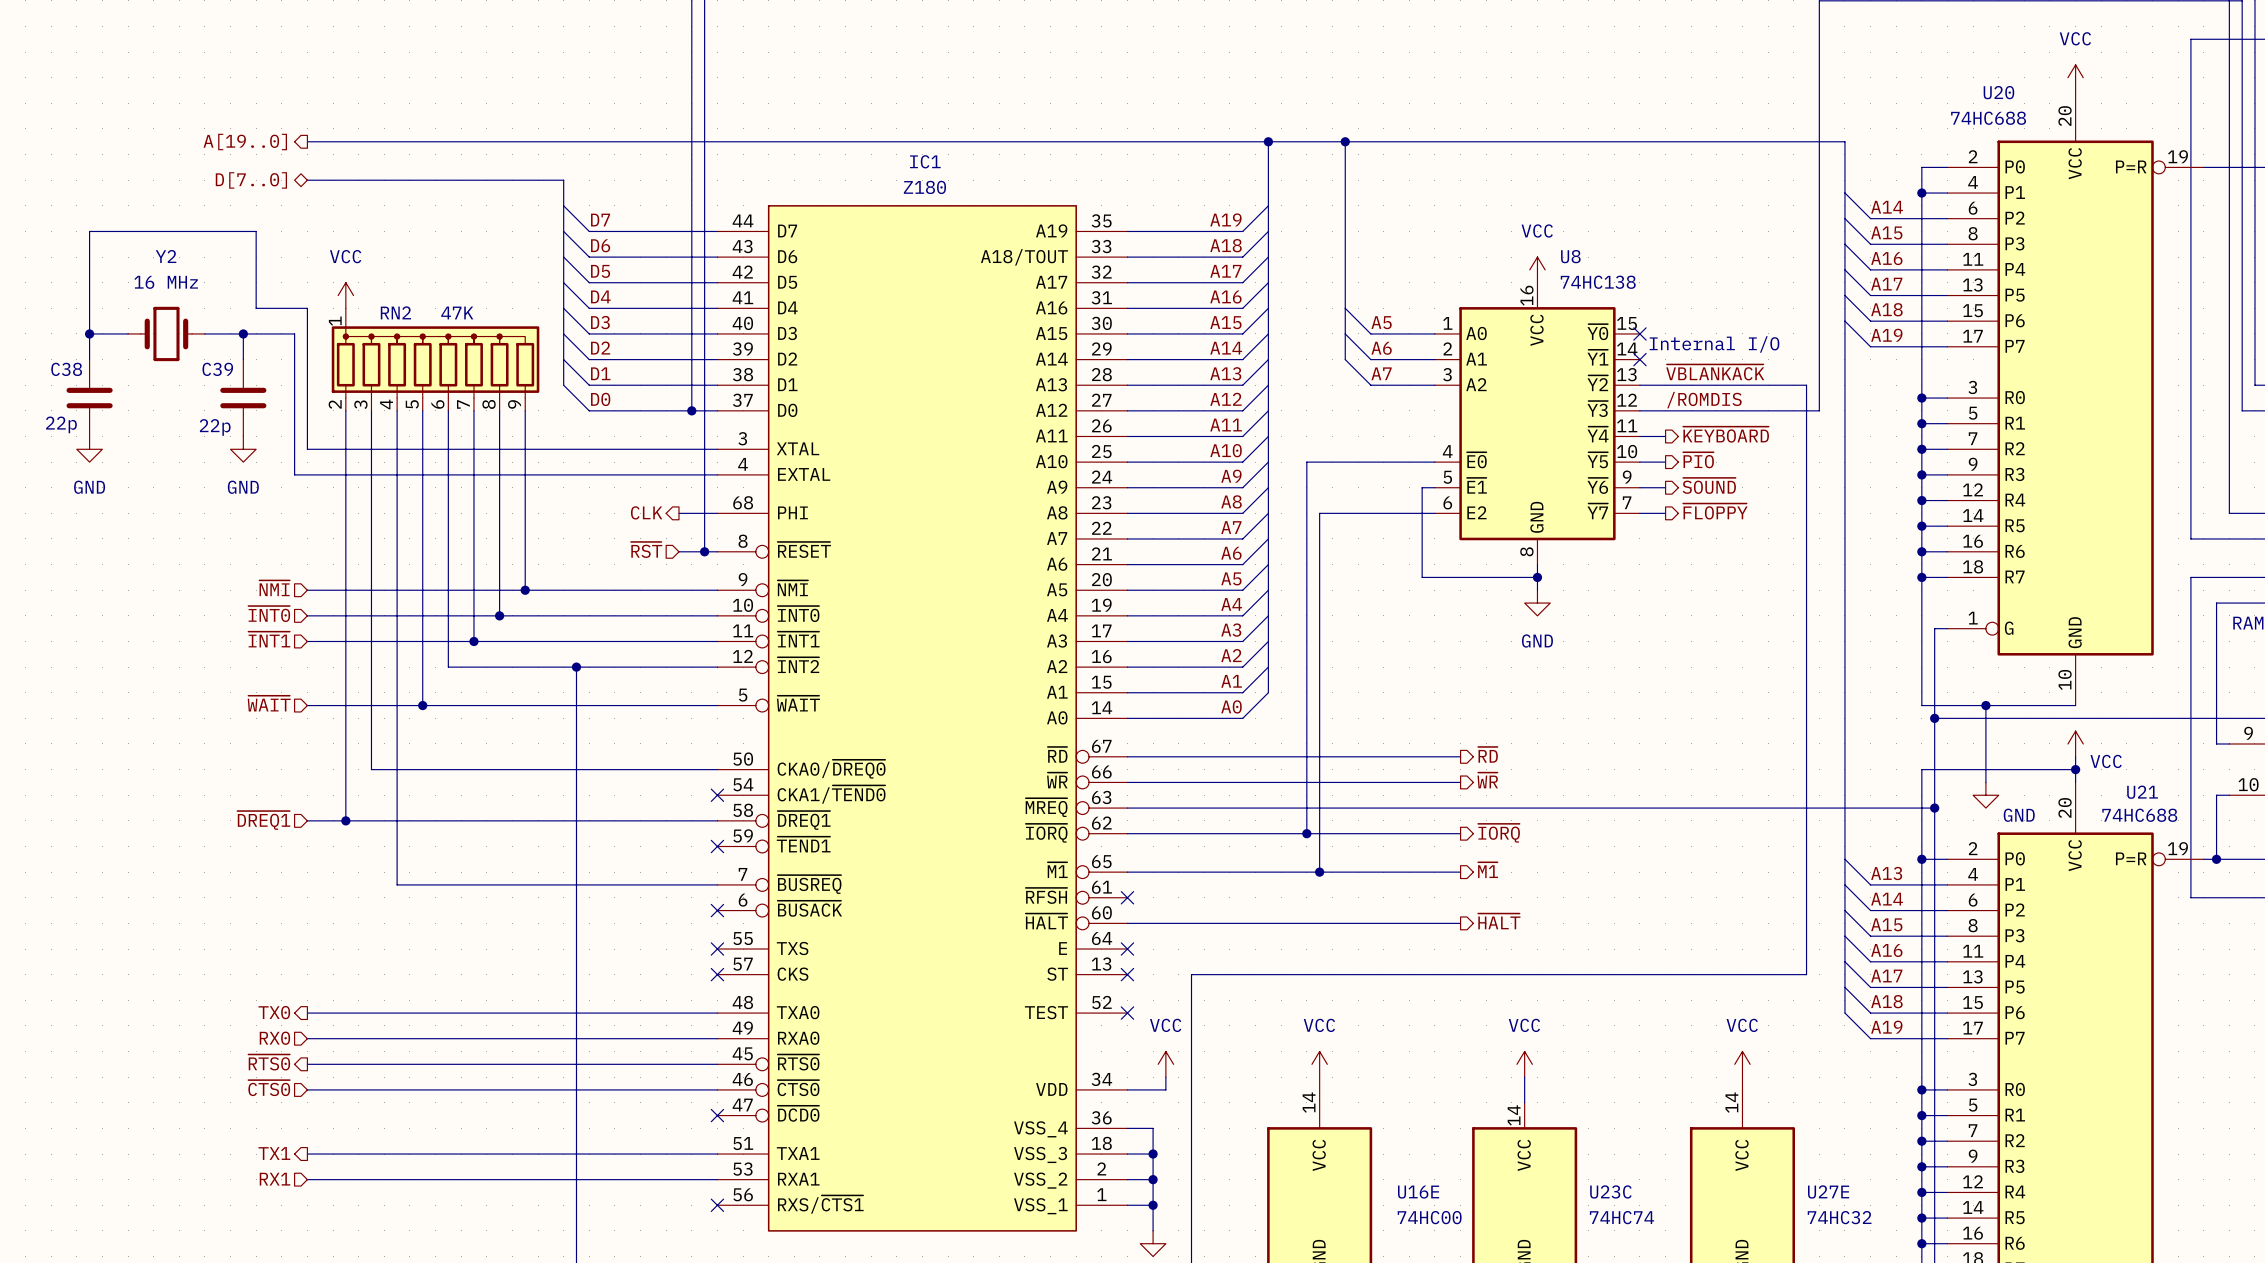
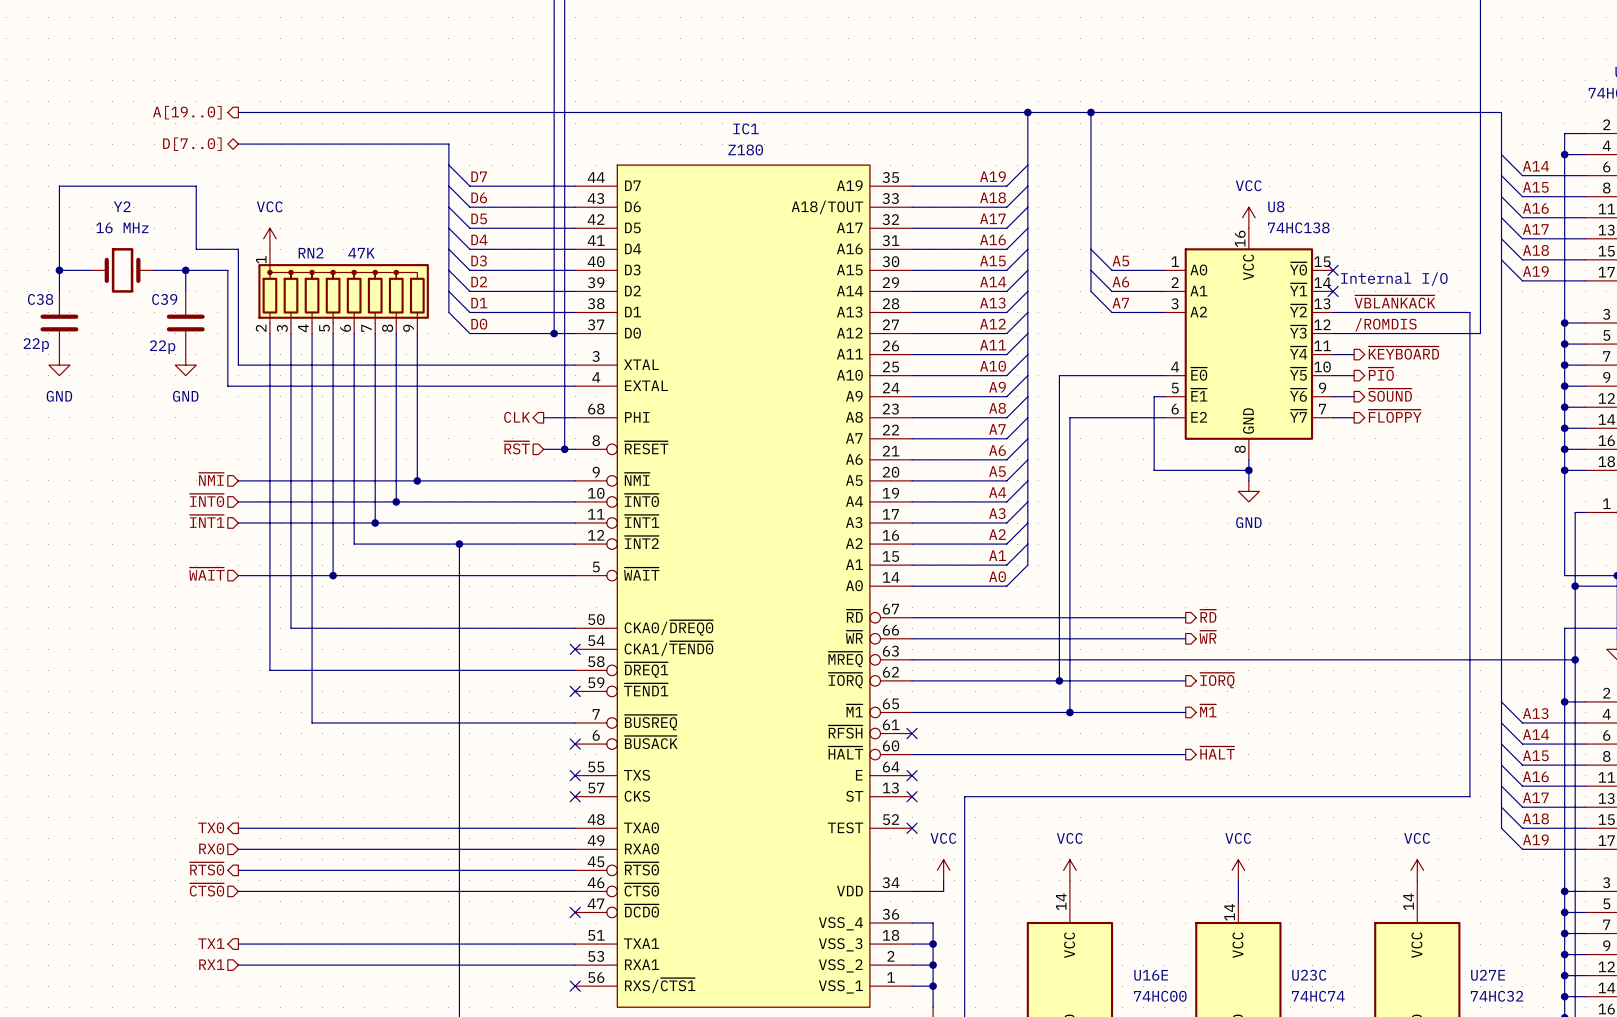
hierarchical label: ~{DREQ1} (263, 820) -> none
wire: (307, 820) (345, 820) -> none
junction: (345, 820) -> none

